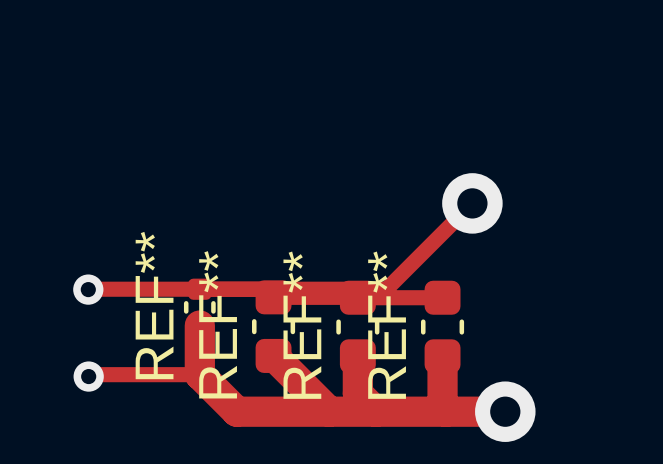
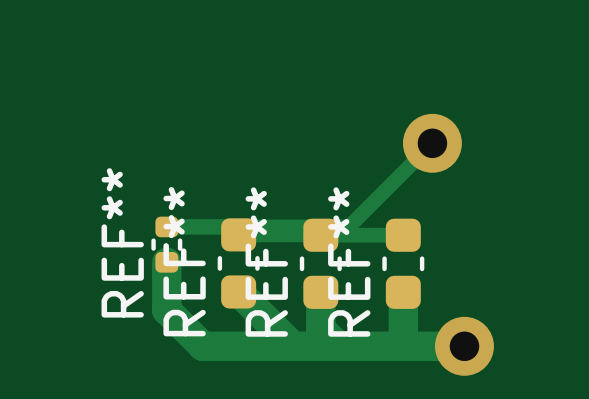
track: (88, 289) (199, 289) -> none
via: (88, 289) -> none
track: (199, 374) (90, 374) (88, 376) -> none
via: (88, 376) -> none

